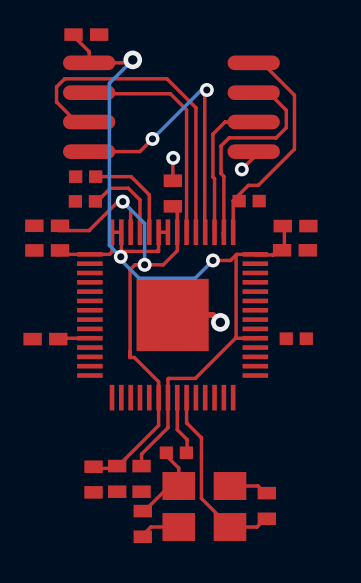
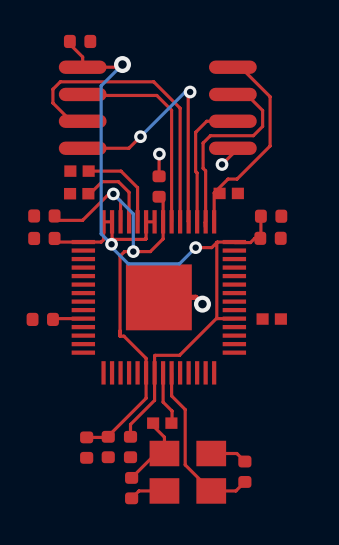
part footprint: [64, 28, 109, 41] -> [63, 34, 97, 49]
part footprint: [163, 174, 183, 213] -> [152, 170, 166, 203]
part footprint: [25, 219, 70, 233] -> [28, 209, 61, 223]
part footprint: [273, 219, 318, 233] -> [254, 209, 288, 223]
part footprint: [272, 243, 317, 257] -> [254, 231, 287, 245]
part footprint: [25, 244, 70, 257] -> [28, 231, 61, 246]
part footprint: [23, 332, 68, 346] -> [26, 312, 59, 327]
part footprint: [107, 459, 127, 498] -> [101, 430, 115, 464]
part footprint: [132, 459, 151, 498] -> [123, 430, 138, 464]
part footprint: [84, 460, 103, 499] -> [80, 431, 94, 464]
part footprint: [257, 486, 277, 526] -> [238, 455, 252, 488]
part footprint: [133, 504, 152, 544] -> [125, 471, 139, 505]

